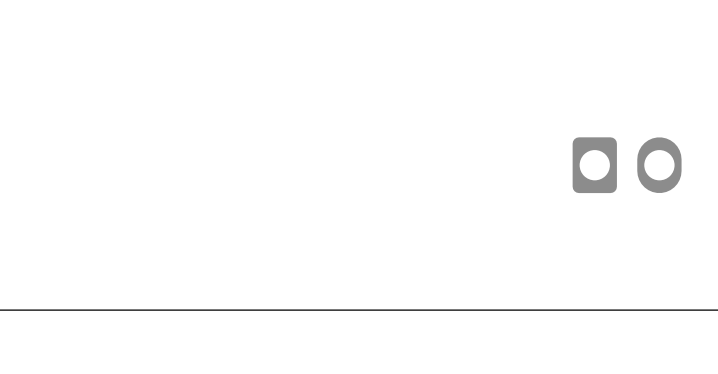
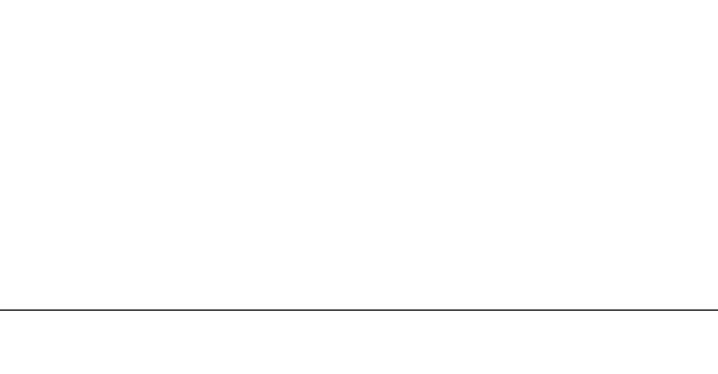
part: (627, 165) -> none

